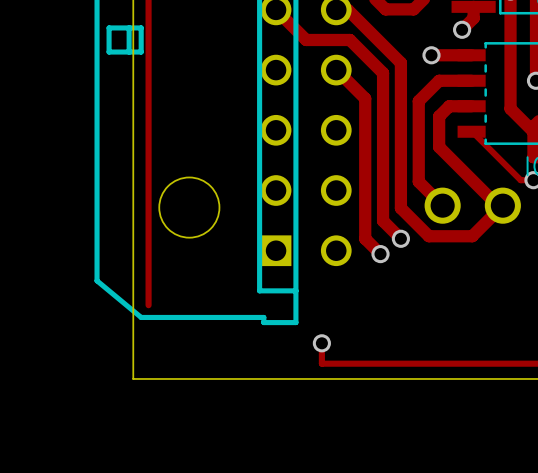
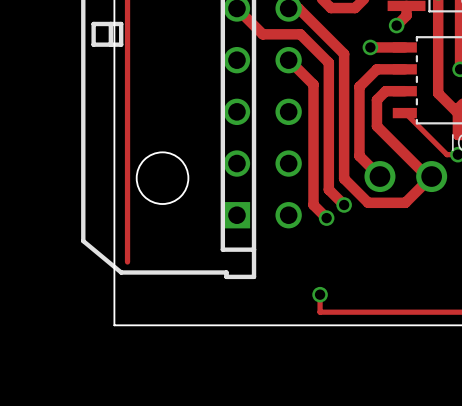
track: (321, 343) (321, 363) (372, 363) -> (320, 294) (320, 312)
via position: (321, 343) -> (320, 294)

